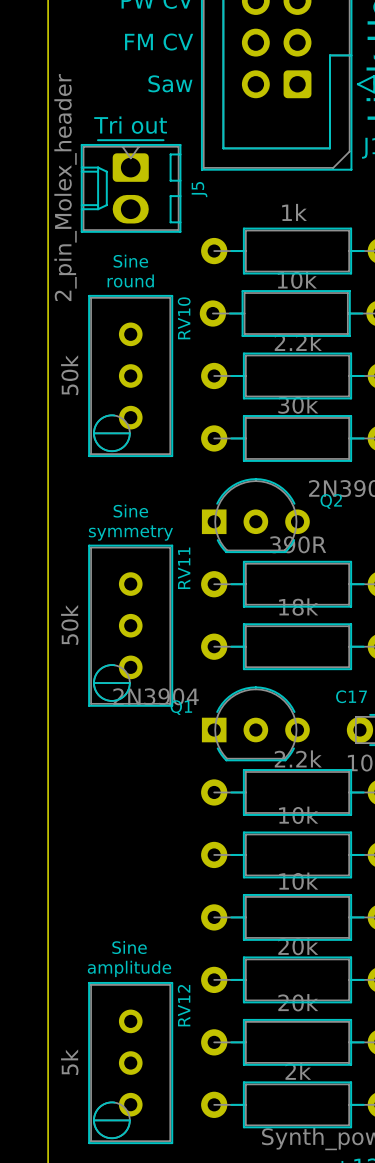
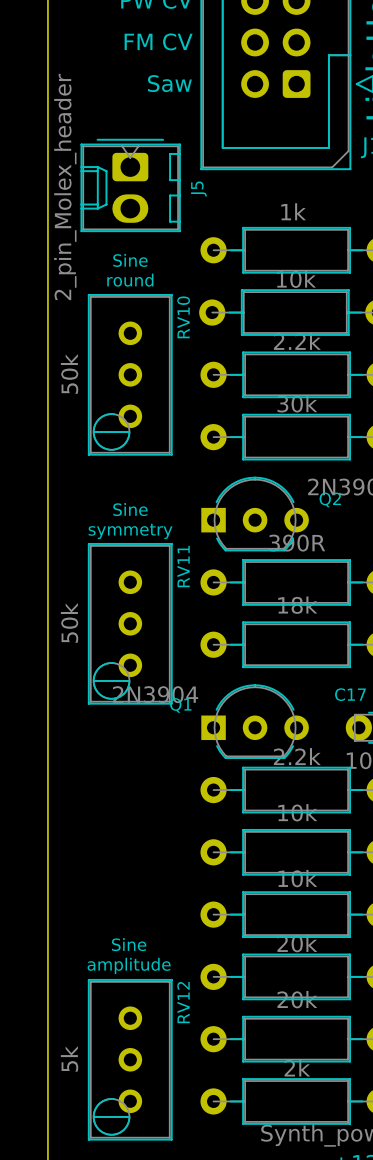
text: Tri out (130, 125) -> none

